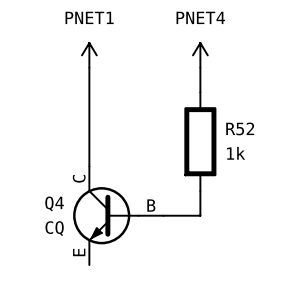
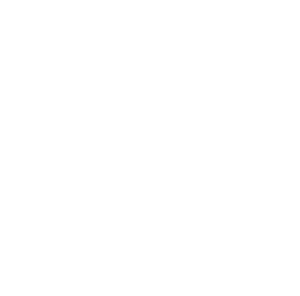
power symbol: PNET1 (89, 55) -> none
power symbol: PNET4 (200, 55) -> none
wire: (89, 67) (89, 166) -> none
wire: (200, 67) (200, 92) -> none
R52: 1k (200, 141) -> none
wire: (200, 191) (200, 215) (163, 215) -> none
Q4: CQ (118, 215) -> none

